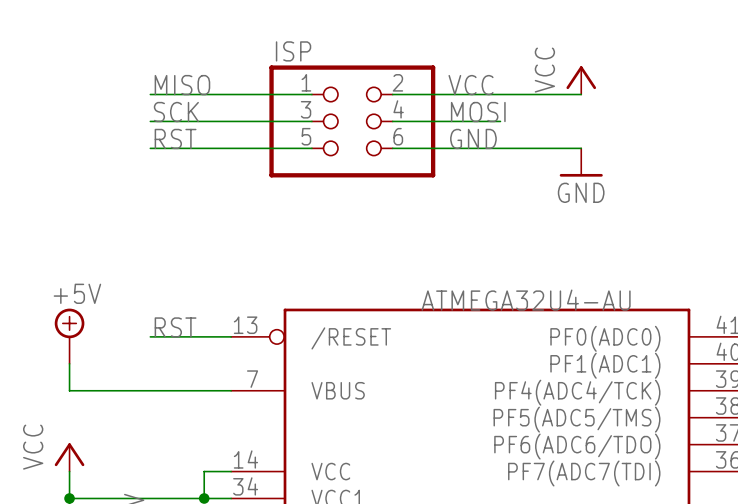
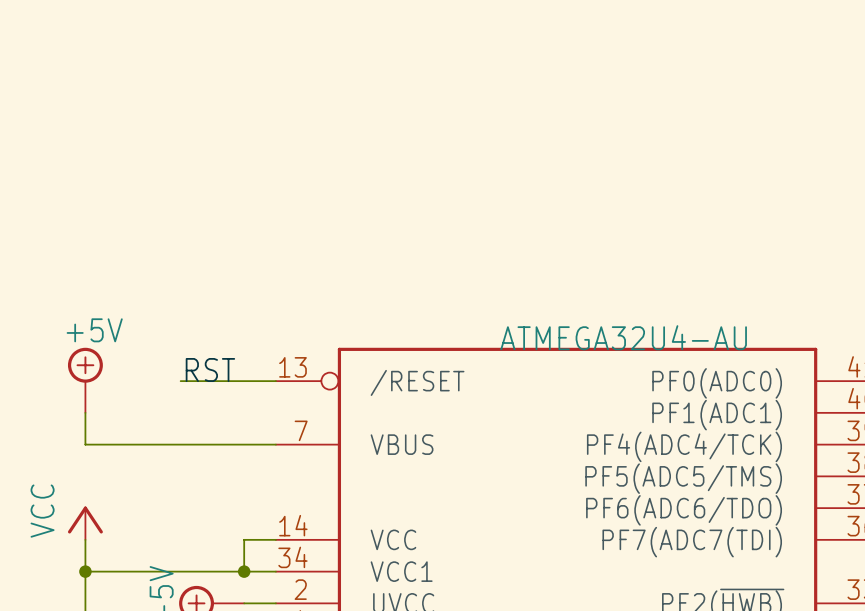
power symbol: VCC (581, 80) -> none
label: MISO (182, 85) -> none
label: VCC (471, 85) -> none
wire: (150, 94) (311, 94) -> none
wire: (392, 94) (581, 94) -> none
label: SCK (176, 112) -> none
label: MOSI (478, 112) -> none
wire: (150, 121) (311, 121) -> none
ISP: (352, 121) -> none
wire: (392, 121) (500, 121) -> none
label: RST (175, 138) -> none
label: GND (473, 138) -> none
wire: (150, 148) (311, 148) -> none
wire: (392, 148) (581, 148) -> none
power symbol: GND (581, 162) -> none

